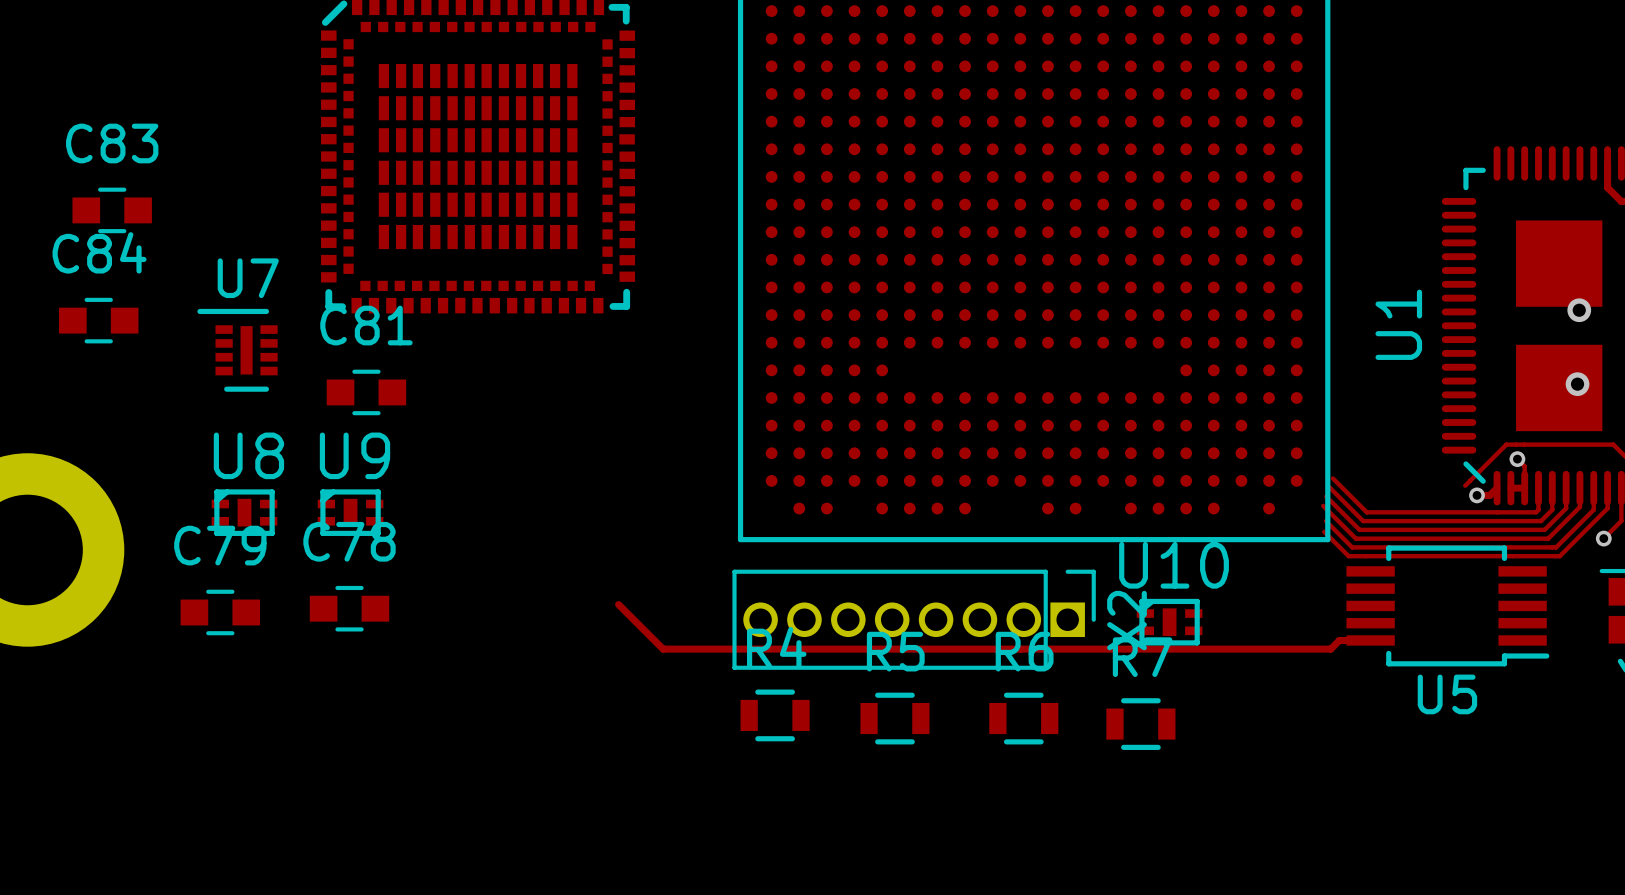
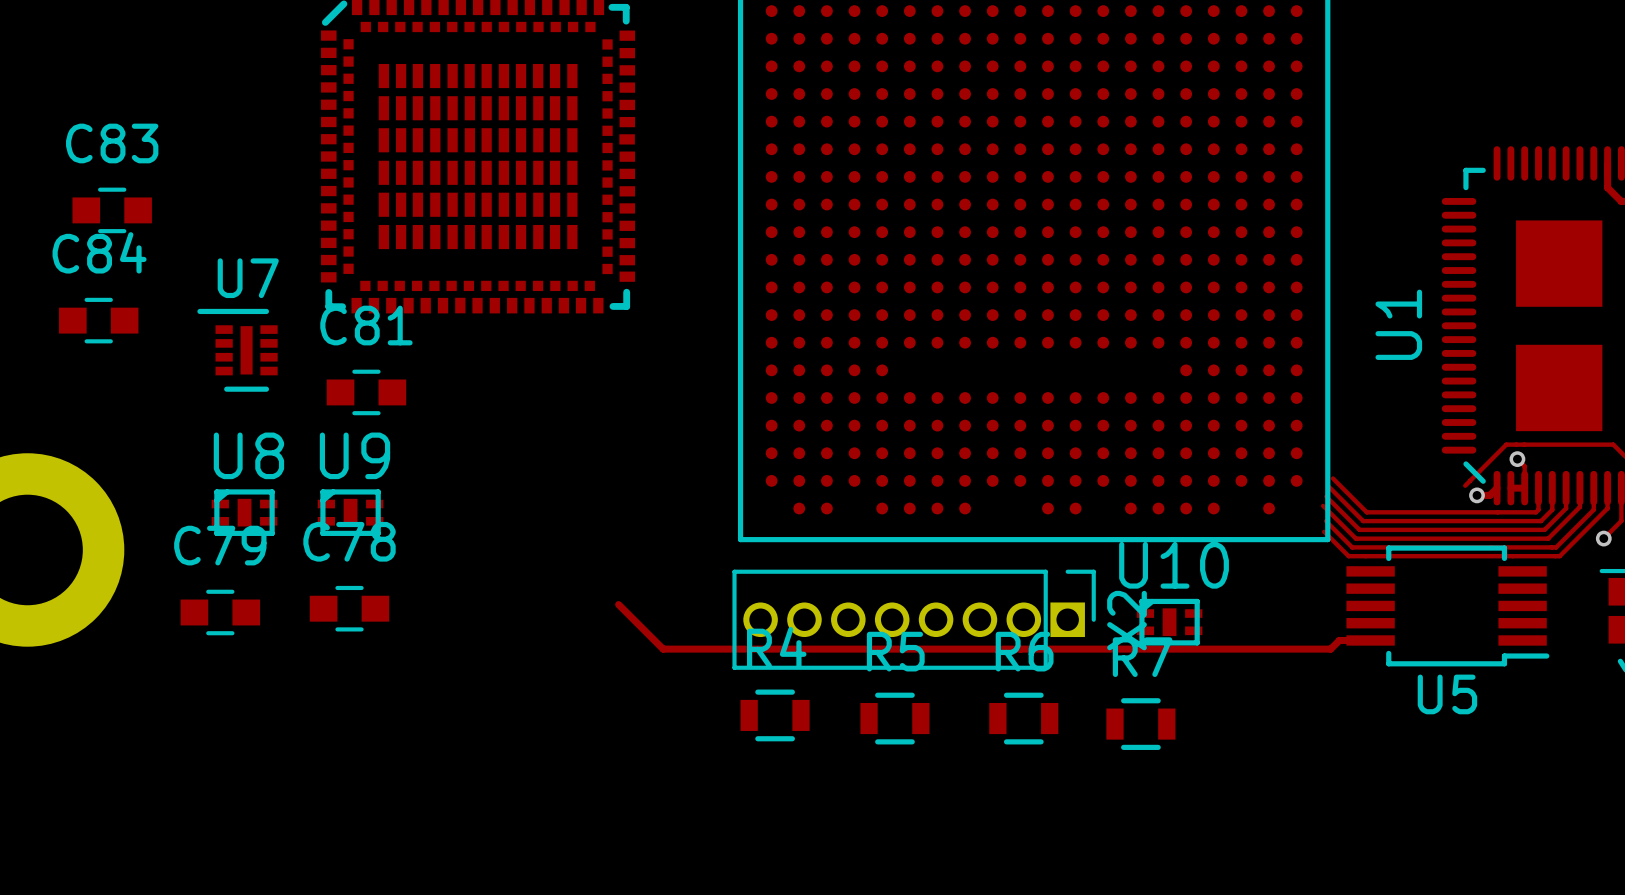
via: (1579, 310) -> none
via: (1577, 384) -> none

